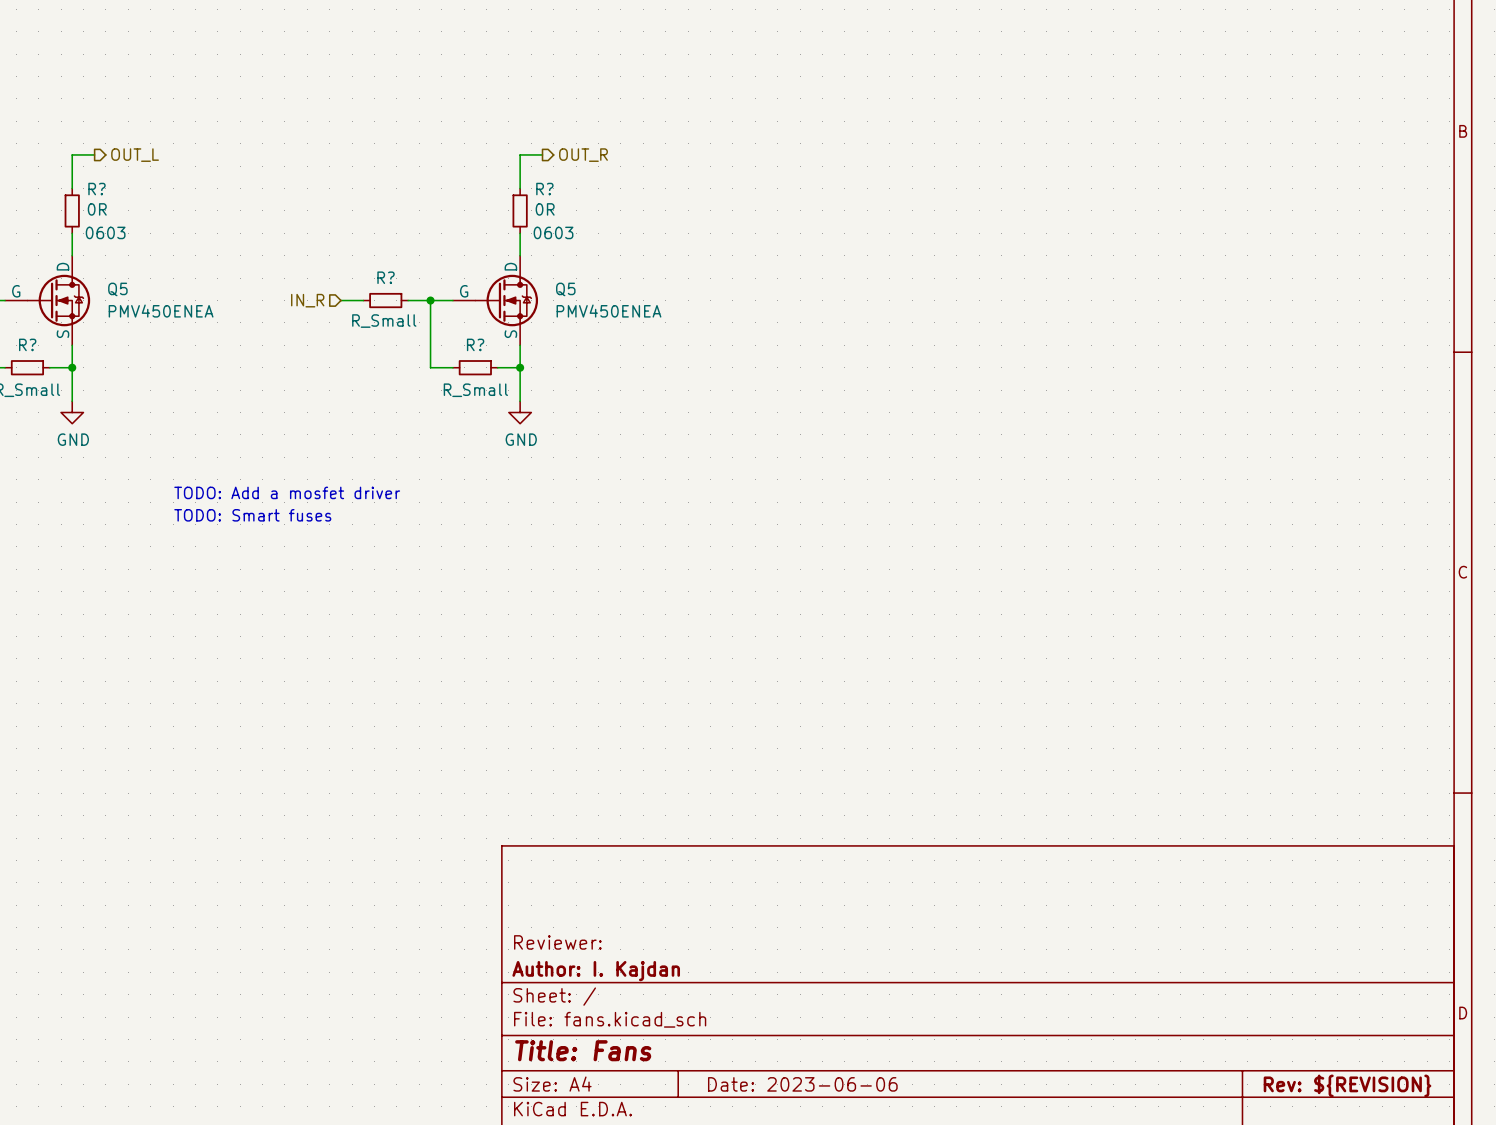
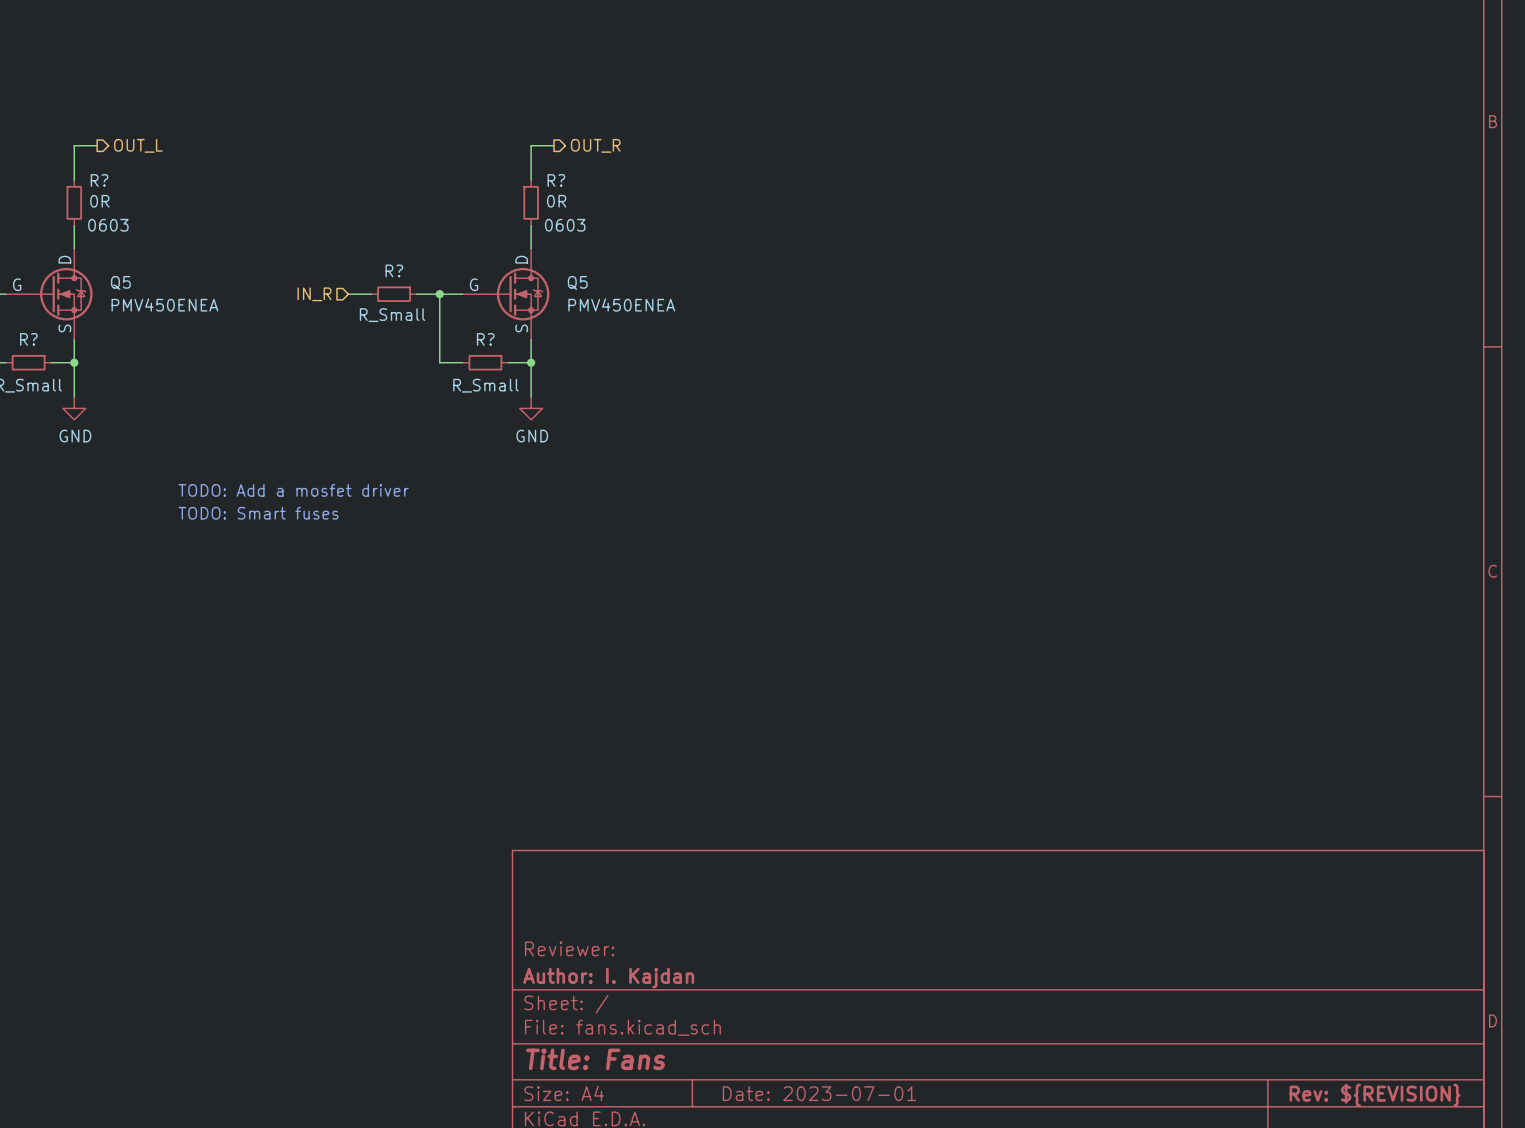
title block: Date: 2023-06-06 (802, 1084) -> Date: 2023-07-01 (819, 1093)

